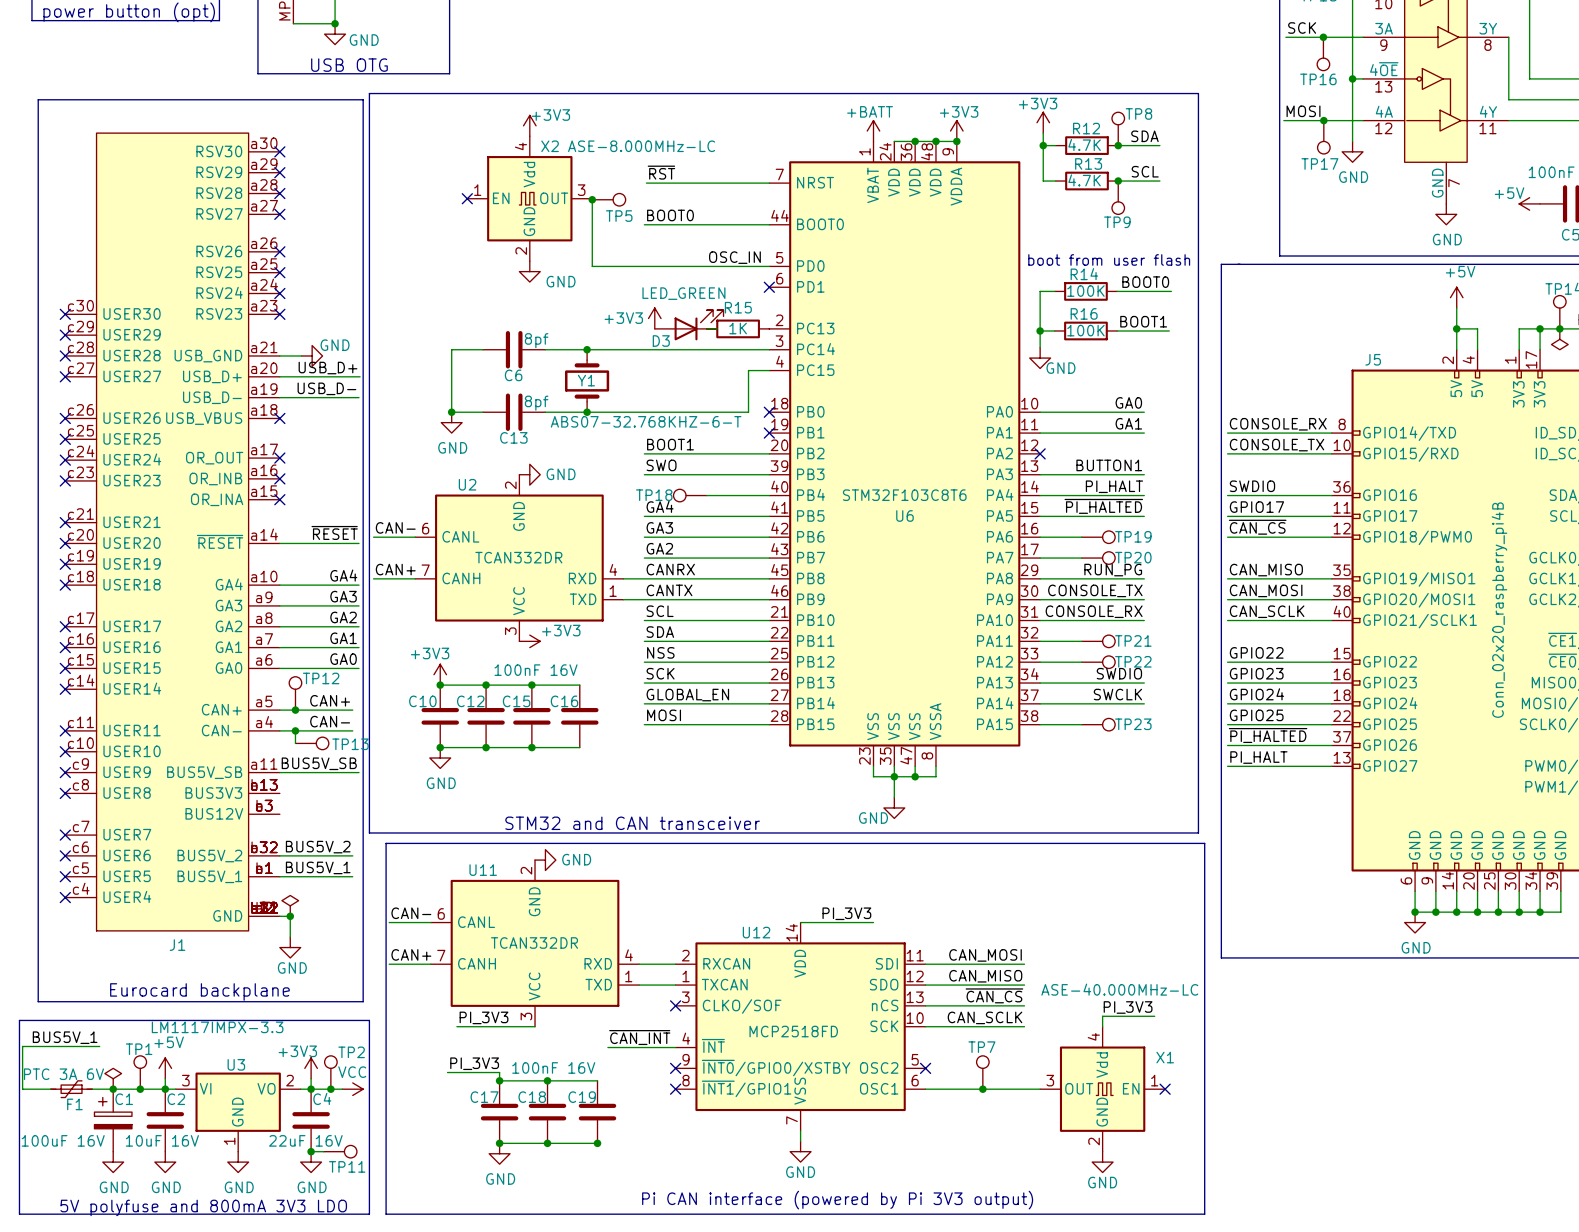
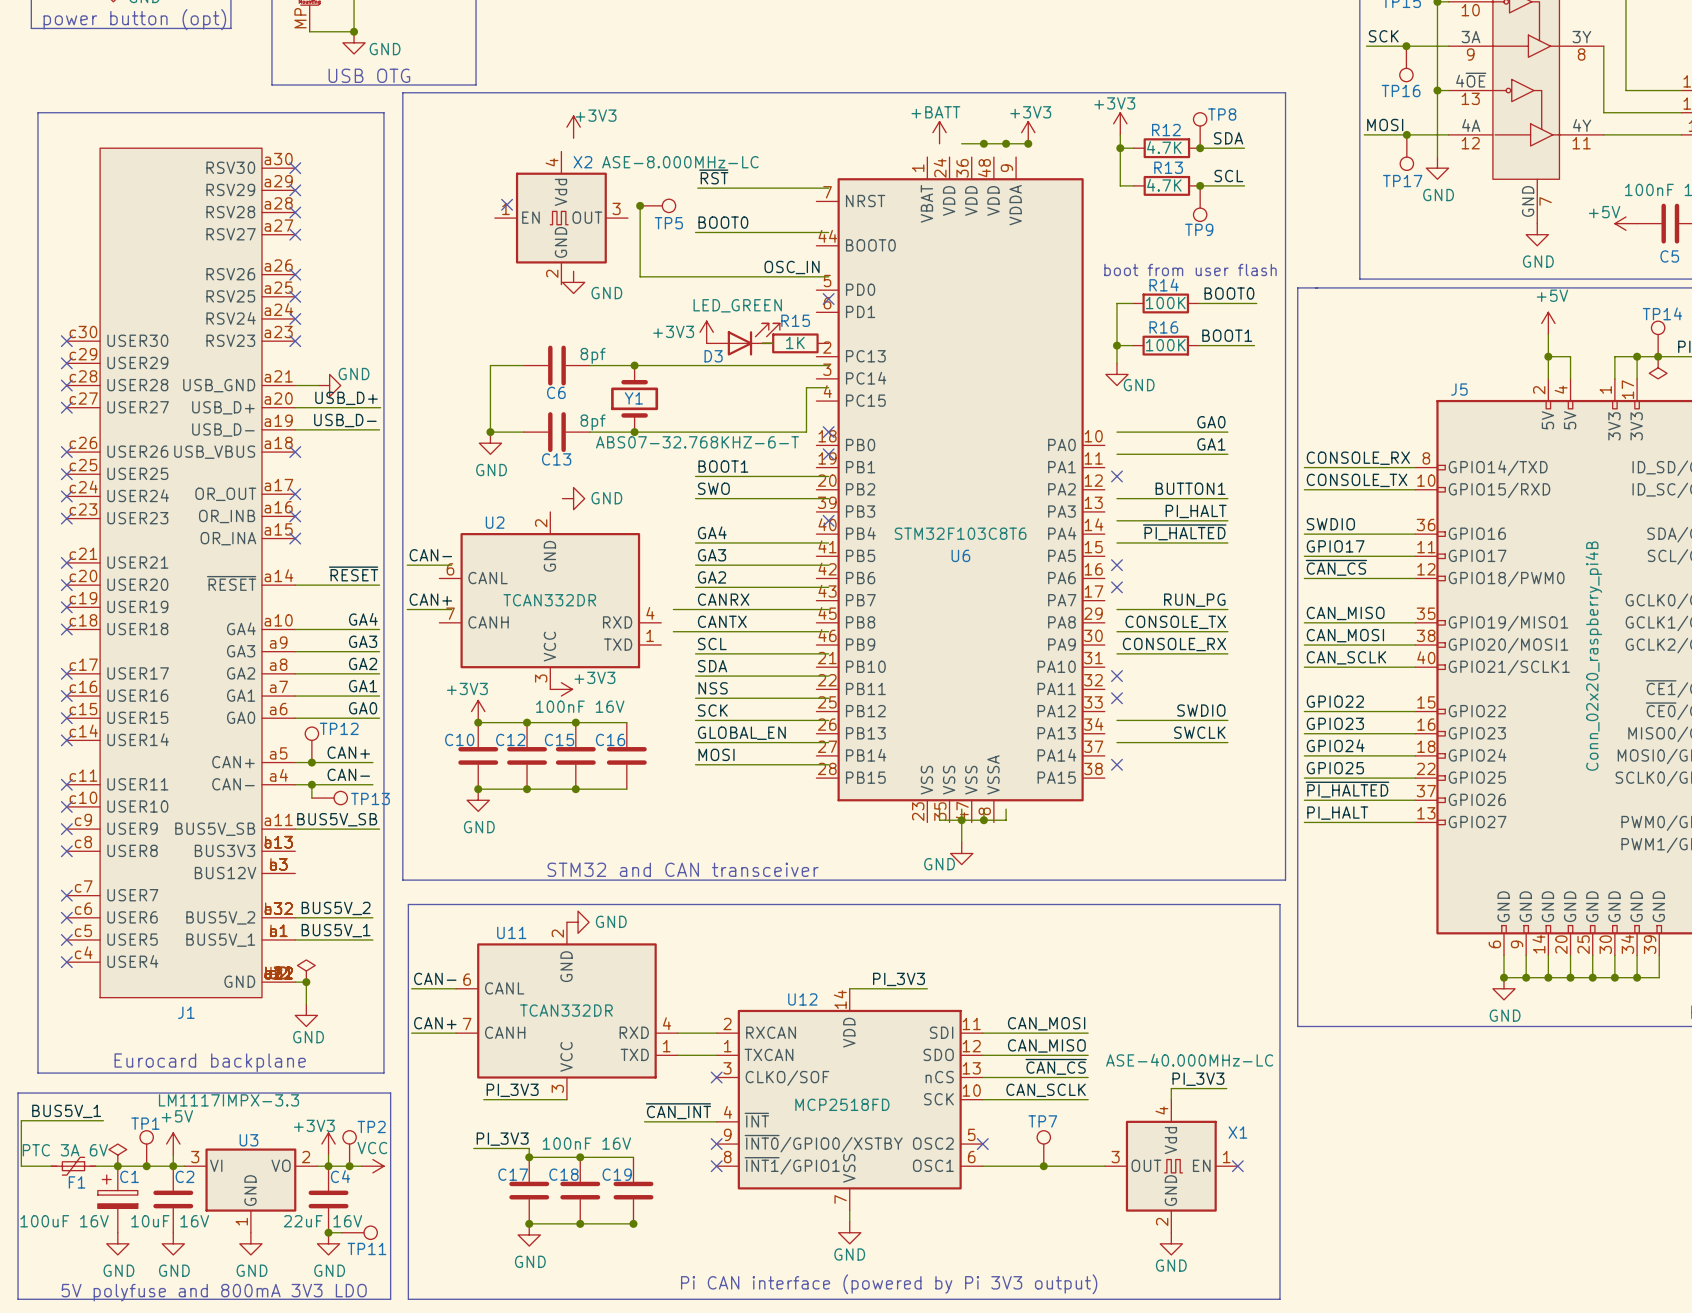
line: (369, 93) (1198, 93) (1198, 832) (369, 832) (369, 93) -> (402, 92) (1285, 92) (1285, 880) (402, 880) (402, 92)
power symbol position: +3V3 (1043, 122) -> +3V3 (1120, 123)
power symbol position: +3V3 (529, 125) -> +3V3 (573, 127)
junction: none -> (983, 143)
junction: none -> (1006, 143)
junction: none -> (1028, 143)
TP8 position: (1118, 128) -> (1200, 130)
power symbol position: +BATT (873, 131) -> +BATT (939, 132)
power symbol position: +3V3 (956, 131) -> +3V3 (1028, 132)
wire: (1043, 133) (1043, 181) (1055, 181) -> (1120, 134) (1120, 185) (1133, 185)
junction: none -> (1200, 148)
label position: SDA (1144, 136) -> SDA (1228, 138)
wire: (894, 141) (956, 141) -> (961, 143) (1028, 143)
junction: (915, 141) -> none
junction: (935, 141) -> none
junction: (956, 141) -> none
wire: (1043, 145) (1055, 145) -> (1120, 148) (1133, 148)
junction position: (1043, 145) -> (1120, 148)
R12 position: (1087, 145) -> (1166, 148)
wire: (1118, 145) (1159, 145) -> (1200, 148) (1244, 148)
junction: (1118, 145) -> none
junction: none -> (1200, 185)
label position: SCL (1145, 171) -> SCL (1228, 176)
label position: ~{RST} (661, 172) -> ~{RST} (713, 176)
R13 position: (1087, 181) -> (1166, 185)
wire: (1118, 181) (1159, 181) -> (1200, 185) (1244, 185)
junction: (1118, 181) -> none
wire: (646, 183) (769, 183) -> (697, 188) (828, 188)
TP9 position: (1118, 197) -> (1200, 203)
no-connect mark position: (467, 198) -> (507, 204)
wire: (592, 198) (592, 266) (769, 266) -> (640, 204) (640, 276) (828, 276)
junction position: (592, 199) -> (640, 205)
TP5 position: (608, 199) -> (657, 205)
label position: BOOT0 (670, 215) -> BOOT0 (723, 222)
wire: (644, 224) (769, 224) -> (695, 232) (828, 232)
label position: OSC_IN (734, 257) -> OSC_IN (792, 267)
text position: boot from user flash (1109, 259) -> boot from user flash (1190, 269)
power symbol position: GND (529, 271) -> GND (573, 282)
label position: BOOT0 (1145, 282) -> BOOT0 (1229, 293)
no-connect mark position: (769, 287) -> (828, 299)
wire: (1054, 291) (1040, 291) (1040, 347) -> (1132, 303) (1116, 303) (1116, 363)
R14 position: (1085, 291) -> (1165, 303)
wire: (1117, 291) (1171, 291) -> (1199, 303) (1256, 303)
power symbol position: +3V3 (654, 318) -> +3V3 (706, 332)
label position: BOOT1 (1143, 321) -> BOOT1 (1227, 335)
D3 position: (689, 325) -> (743, 339)
wire: (706, 328) (717, 328) -> (762, 343) (773, 343)
R15 position: (738, 328) -> (795, 343)
wire: (1040, 330) (1054, 330) -> (1116, 345) (1132, 345)
junction position: (1040, 330) -> (1116, 345)
R16 position: (1085, 330) -> (1165, 345)
wire: (1117, 330) (1169, 330) -> (1199, 345) (1254, 345)
C6 value position: 8pf (536, 340) -> 8pf (593, 355)
wire: (482, 349) (451, 349) (451, 412) (482, 412) -> (523, 365) (490, 365) (490, 432) (523, 432)
C6 position: (514, 349) -> (556, 365)
wire: (545, 349) (769, 349) -> (590, 365) (828, 365)
junction position: (587, 349) -> (634, 365)
power symbol position: GND (1040, 358) -> GND (1116, 374)
wire: (769, 370) (748, 370) (748, 412) (545, 412) -> (828, 387) (806, 387) (806, 432) (590, 432)
Y1 position: (587, 380) -> (634, 398)
no-connect mark: none -> (828, 432)
label position: GA0 (1128, 402) -> GA0 (1211, 422)
C13 value position: 8pf (536, 403) -> 8pf (593, 422)
junction position: (451, 412) -> (490, 432)
C13 position: (514, 412) -> (556, 432)
junction position: (587, 412) -> (634, 432)
no-connect mark: (769, 412) -> none
wire: (1040, 412) (1144, 412) -> (1116, 432) (1227, 432)
no-connect mark: none -> (828, 454)
power symbol position: GND (451, 422) -> GND (490, 443)
label position: GA1 (1128, 423) -> GA1 (1211, 444)
no-connect mark: (769, 433) -> none
wire: (1040, 433) (1144, 433) -> (1116, 454) (1227, 454)
label position: BOOT1 (670, 444) -> BOOT1 (723, 466)
wire: (644, 453) (769, 453) -> (695, 476) (828, 476)
no-connect mark position: (1040, 453) -> (1116, 476)
label position: SWO (661, 465) -> SWO (713, 488)
label position: BUTTON1 (1109, 465) -> BUTTON1 (1190, 488)
power symbol position: GND (529, 474) -> GND (573, 498)
wire: (644, 474) (769, 474) -> (695, 498) (828, 498)
wire: (1040, 474) (1144, 474) -> (1116, 498) (1227, 498)
no-connect mark: none -> (828, 520)
label position: PI_HALT (1114, 486) -> PI_HALT (1196, 511)
TP18: (690, 495) -> none
wire: (706, 495) (769, 495) -> none
wire: (1040, 495) (1144, 495) -> (1116, 520) (1227, 520)
label position: GA4 (660, 506) -> GA4 (712, 532)
label position: ~{PI_HALTED} (1103, 506) -> ~{PI_HALTED} (1184, 532)
wire: (644, 516) (769, 516) -> (695, 542) (828, 542)
wire: (1040, 516) (1144, 516) -> (1116, 542) (1227, 542)
no-connect mark: none -> (1116, 565)
label position: CAN- (395, 527) -> CAN- (430, 555)
label position: GA3 (659, 527) -> GA3 (712, 555)
wire: (373, 537) (415, 537) -> (407, 565) (451, 565)
wire: (644, 537) (769, 537) -> (695, 565) (828, 565)
wire: (1040, 537) (1081, 537) -> none
TP19: (1098, 537) -> none
no-connect mark: none -> (1116, 587)
label position: GA2 (659, 548) -> GA2 (712, 577)
wire: (644, 558) (769, 558) -> (695, 587) (828, 587)
wire: (1040, 558) (1081, 558) -> none
TP20: (1098, 558) -> none
label position: CAN+ (395, 569) -> CAN+ (430, 599)
label position: CANRX (670, 569) -> CANRX (723, 599)
label position: RUN_PG (1113, 570) -> RUN_PG (1194, 600)
wire: (373, 578) (415, 578) -> (407, 609) (451, 609)
wire: (623, 578) (769, 578) -> (673, 609) (828, 609)
wire: (1040, 578) (1144, 578) -> (1116, 609) (1227, 609)
label position: CANTX (669, 590) -> CANTX (722, 621)
label position: CONSOLE_TX (1095, 590) -> CONSOLE_TX (1175, 622)
wire: (623, 599) (769, 599) -> (673, 631) (828, 631)
wire: (1040, 599) (1144, 599) -> (1116, 631) (1227, 631)
label position: SCL (660, 611) -> SCL (712, 643)
label position: CONSOLE_RX (1094, 611) -> CONSOLE_RX (1174, 644)
wire: (644, 620) (769, 620) -> (695, 653) (828, 653)
wire: (1040, 620) (1144, 620) -> (1116, 653) (1227, 653)
no-connect mark: none -> (1116, 676)
label position: SDA (660, 632) -> SDA (712, 666)
wire: (644, 641) (769, 641) -> (695, 676) (828, 676)
wire: (1040, 641) (1081, 641) -> none
TP21: (1098, 641) -> none
no-connect mark: none -> (1116, 698)
label position: NSS (660, 652) -> NSS (713, 688)
wire: (644, 662) (769, 662) -> (695, 698) (828, 698)
wire: (1040, 662) (1081, 662) -> none
TP22: (1098, 662) -> none
label position: SCK (660, 673) -> SCK (712, 710)
label position: SWDIO (1119, 673) -> SWDIO (1201, 710)
power symbol position: +3V3 (440, 674) -> +3V3 (478, 711)
wire: (644, 683) (769, 683) -> (695, 720) (828, 720)
wire: (1040, 683) (1144, 683) -> (1116, 720) (1227, 720)
wire: (440, 685) (579, 685) -> (478, 722) (626, 722)
junction position: (440, 685) -> (478, 722)
junction position: (486, 685) -> (527, 722)
junction position: (531, 685) -> (575, 722)
label position: SWCLK (1117, 694) -> SWCLK (1199, 732)
label position: GLOBAL_EN (687, 695) -> GLOBAL_EN (741, 733)
wire: (644, 703) (769, 703) -> (695, 742) (828, 742)
wire: (1040, 703) (1144, 703) -> (1116, 742) (1227, 742)
no-connect mark: none -> (1116, 764)
label position: MOSI (664, 715) -> MOSI (716, 754)
C10 position: (440, 716) -> (478, 755)
C12 position: (486, 716) -> (527, 755)
C15 position: (531, 716) -> (575, 755)
C16 position: (579, 716) -> (626, 755)
wire: (644, 724) (769, 724) -> (695, 764) (828, 764)
wire: (1040, 724) (1081, 724) -> none
TP23: (1098, 724) -> none
wire: (440, 747) (579, 747) -> (478, 789) (626, 789)
junction position: (440, 747) -> (478, 789)
junction position: (486, 747) -> (527, 789)
junction position: (531, 747) -> (575, 789)
power symbol position: GND (440, 758) -> GND (478, 800)
junction: none -> (961, 820)
junction: none -> (983, 820)
wire: (873, 766) (873, 776) (935, 776) (935, 766) -> (939, 809) (939, 820) (1006, 820) (1006, 809)
wire: (894, 766) (894, 797) -> (961, 809) (961, 842)
wire: (915, 766) (915, 776) -> (983, 809) (983, 820)
junction: (894, 776) -> none
junction: (915, 776) -> none
power symbol position: GND (894, 807) -> GND (961, 853)
text position: STM32 and CAN transceiver (632, 823) -> STM32 and CAN transceiver (683, 869)

